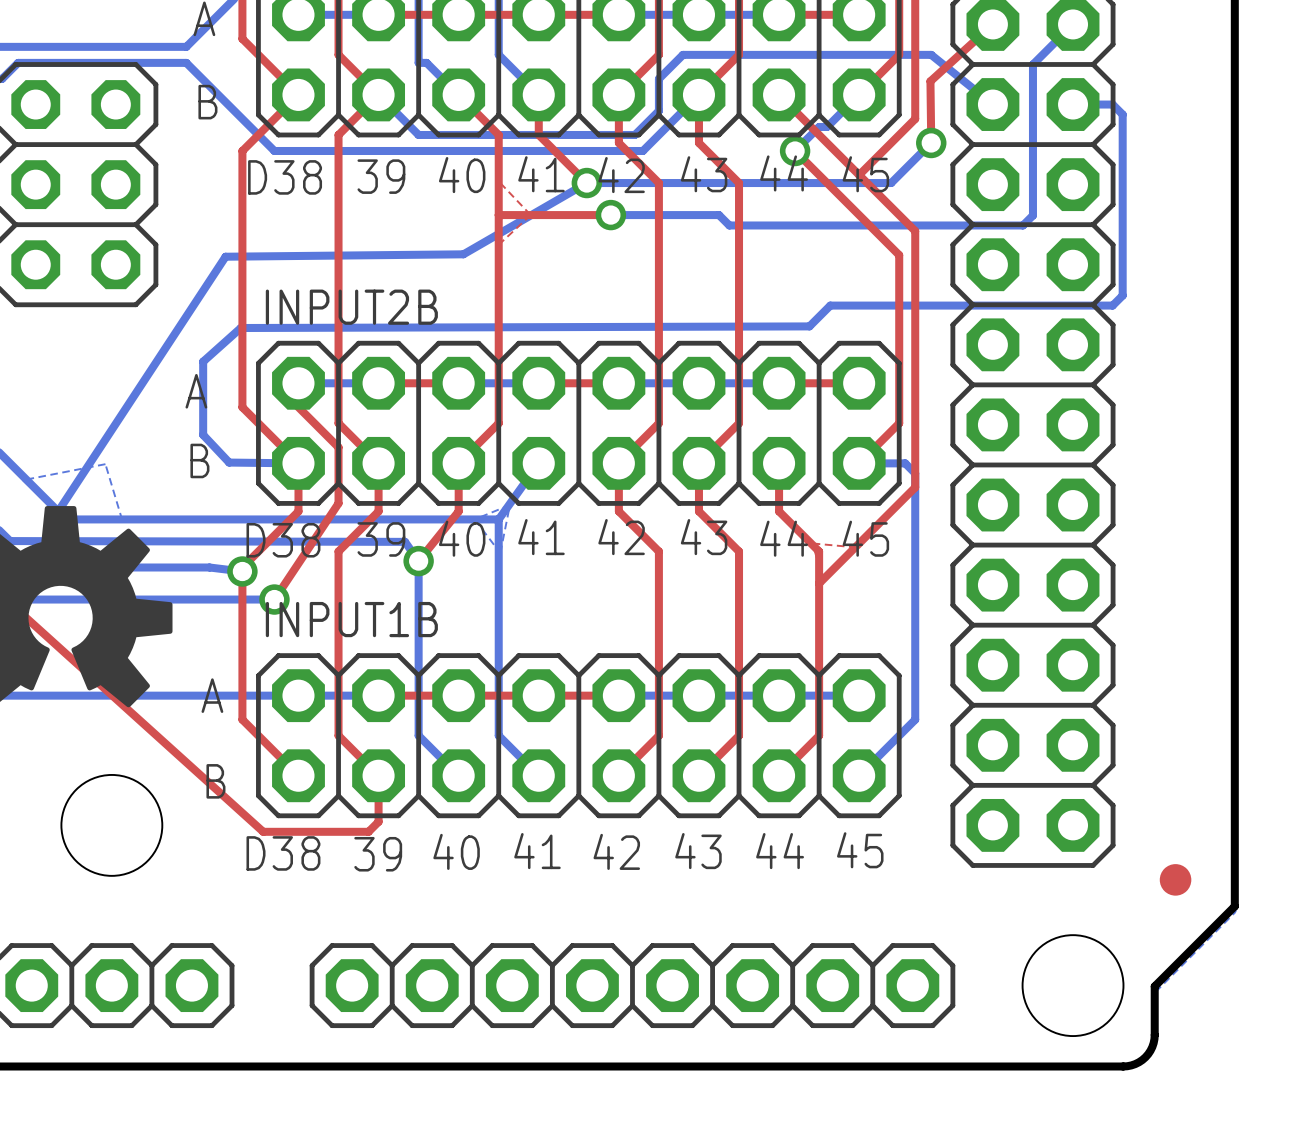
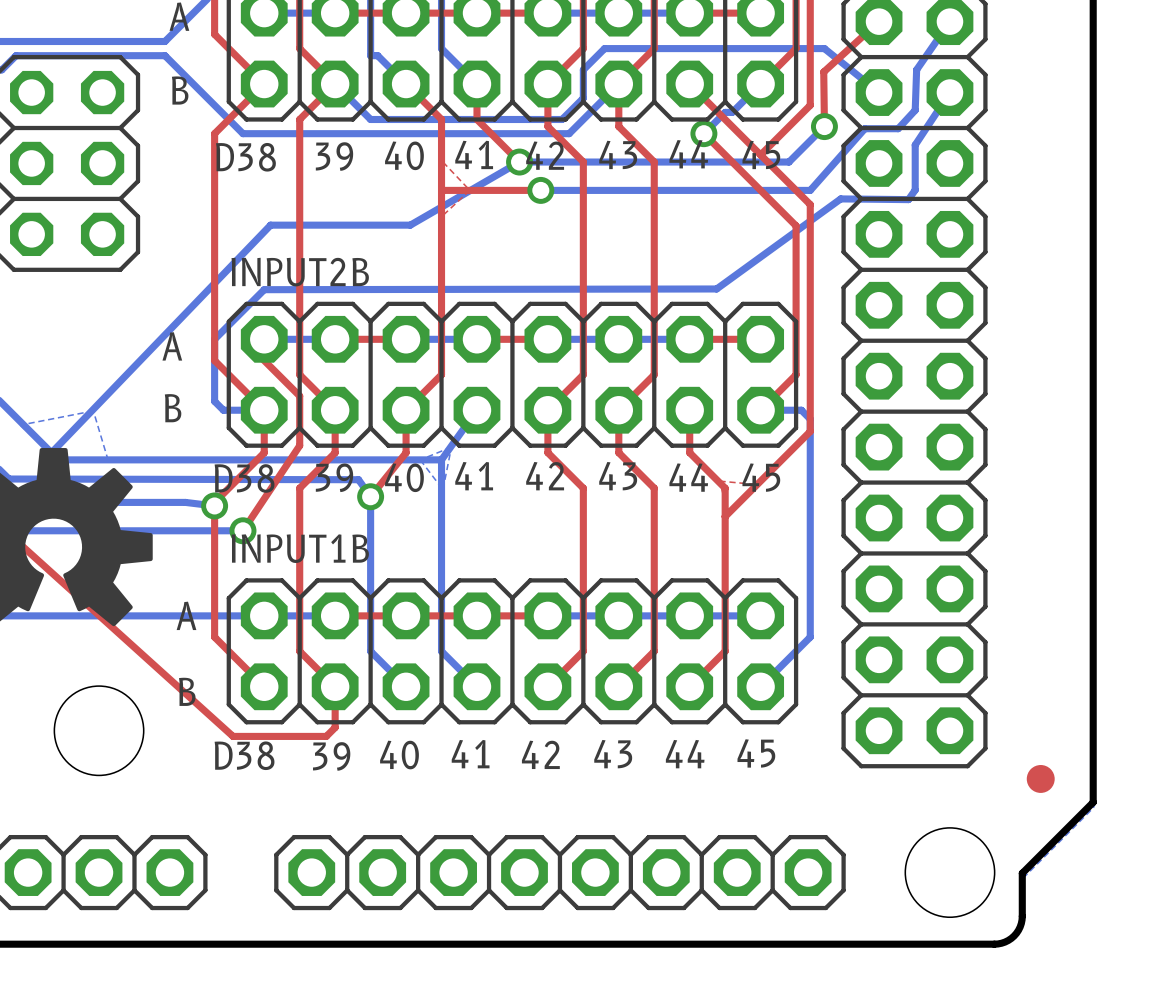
bottom track: (1073, 24) (1032, 64) (1032, 215) (1022, 225) (729, 225) (718, 215) -> (949, 21) (916, 69) (915, 110) (898, 128) (864, 128) (810, 190) (636, 190)
bottom track: (1073, 104) (1112, 104) (1122, 114) (1122, 295) (1112, 305) (830, 305) (809, 326) (240, 328) (203, 361) (203, 434) (229, 462) (298, 463) -> (949, 92) (915, 145) (915, 190) (908, 199) (840, 198) (716, 288) (264, 289) (214, 339) (214, 401) (223, 410) (264, 410)
bottom track: (463, 254) (225, 256) (58, 511) -> (410, 225) (270, 225) (51, 452)

